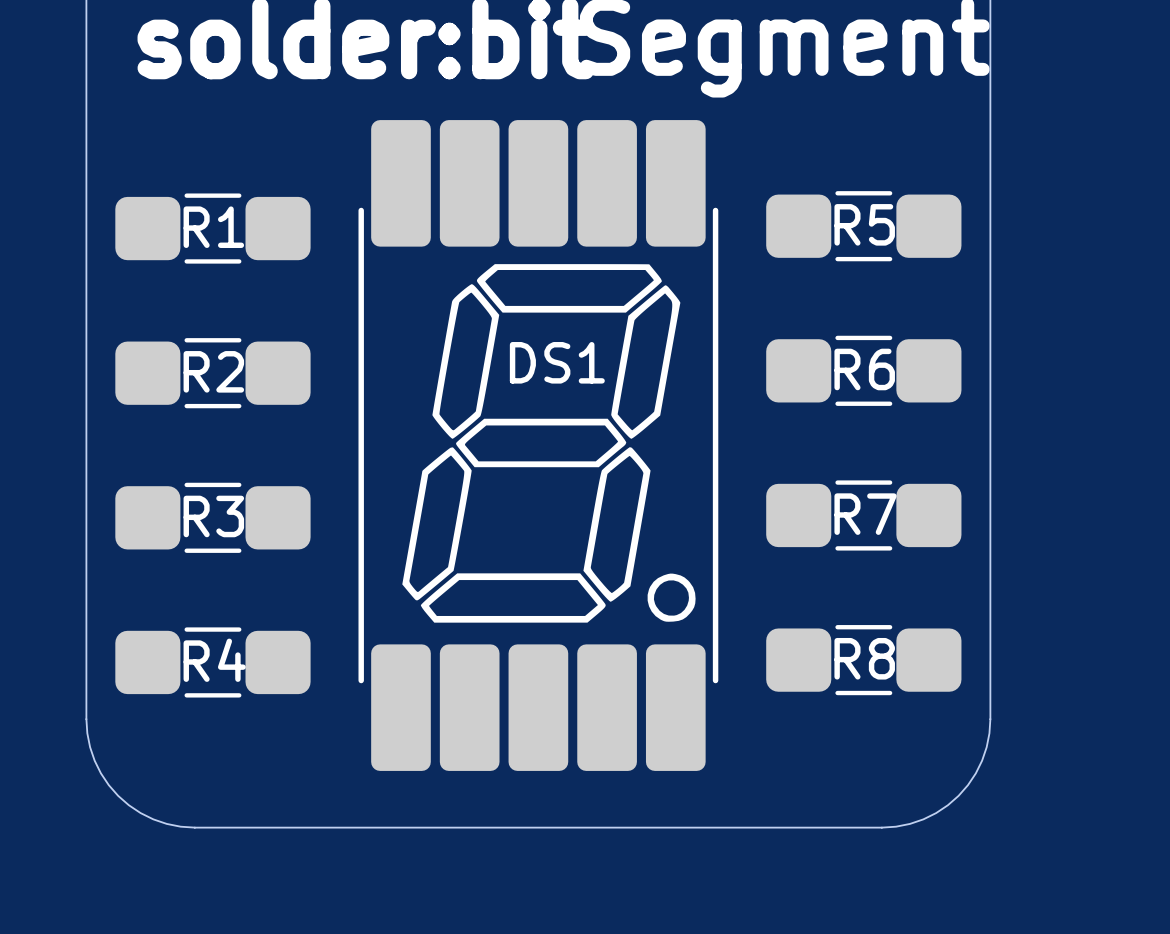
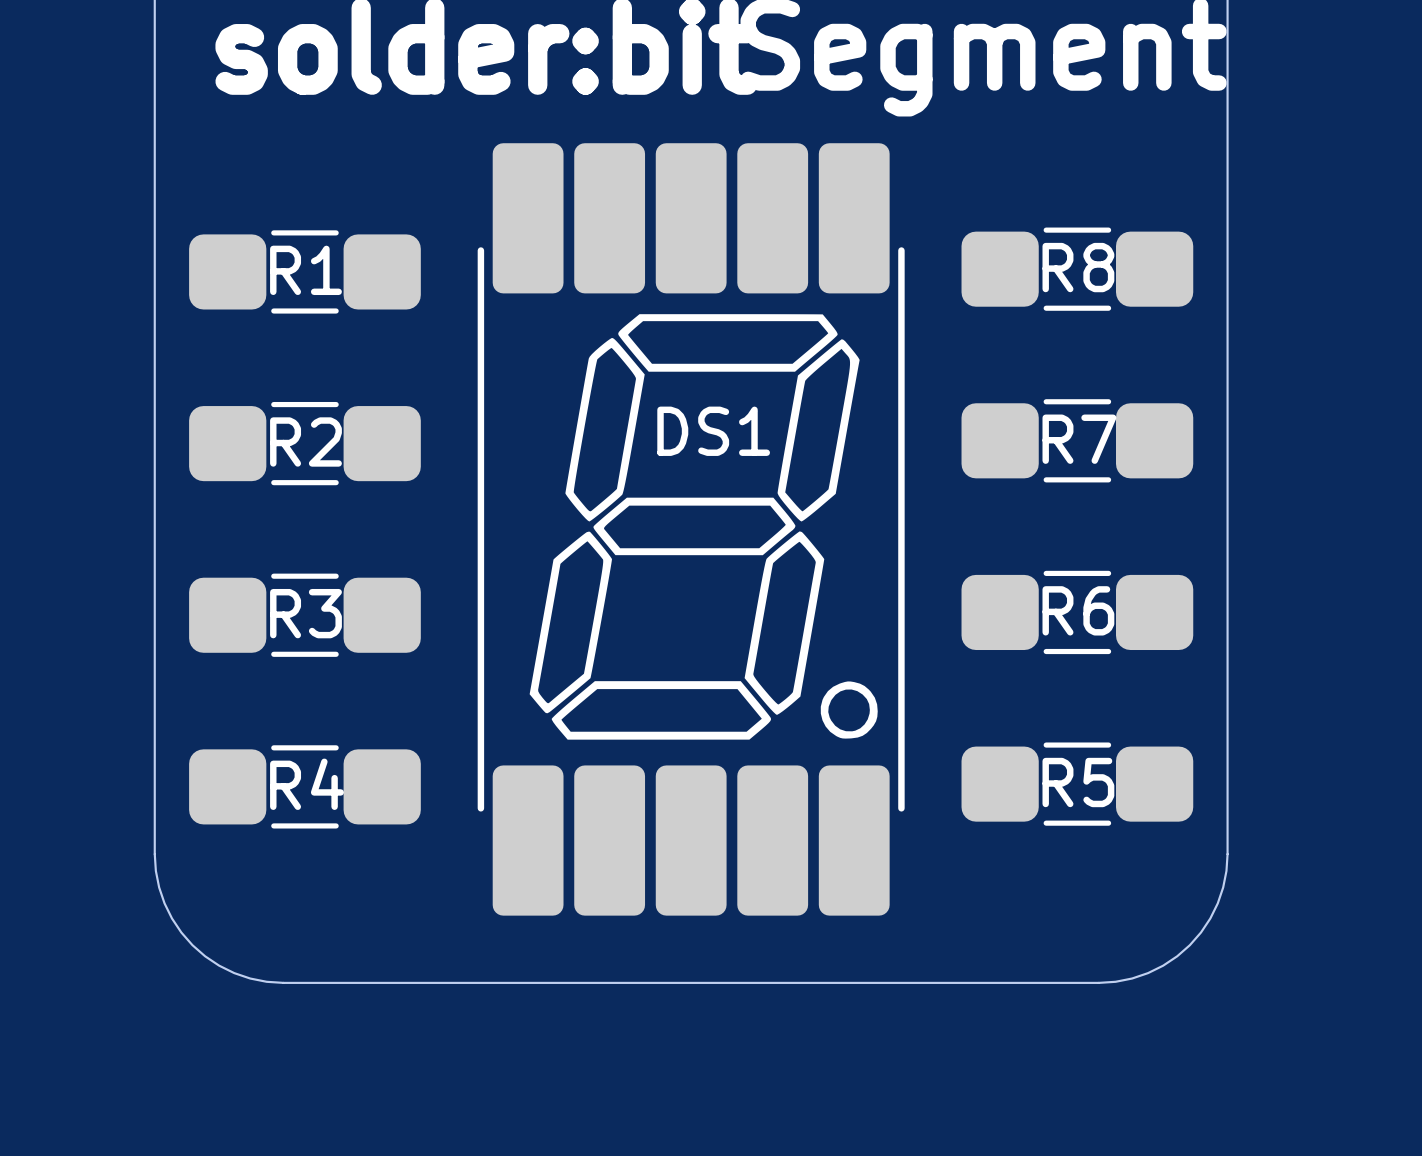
R5 name: R5 (864, 224) -> R8 (1078, 267)
R6 name: R6 (864, 369) -> R7 (1079, 439)
R7 name: R7 (865, 514) -> R6 (1078, 610)
R8 name: R8 (864, 658) -> R5 (1078, 782)

